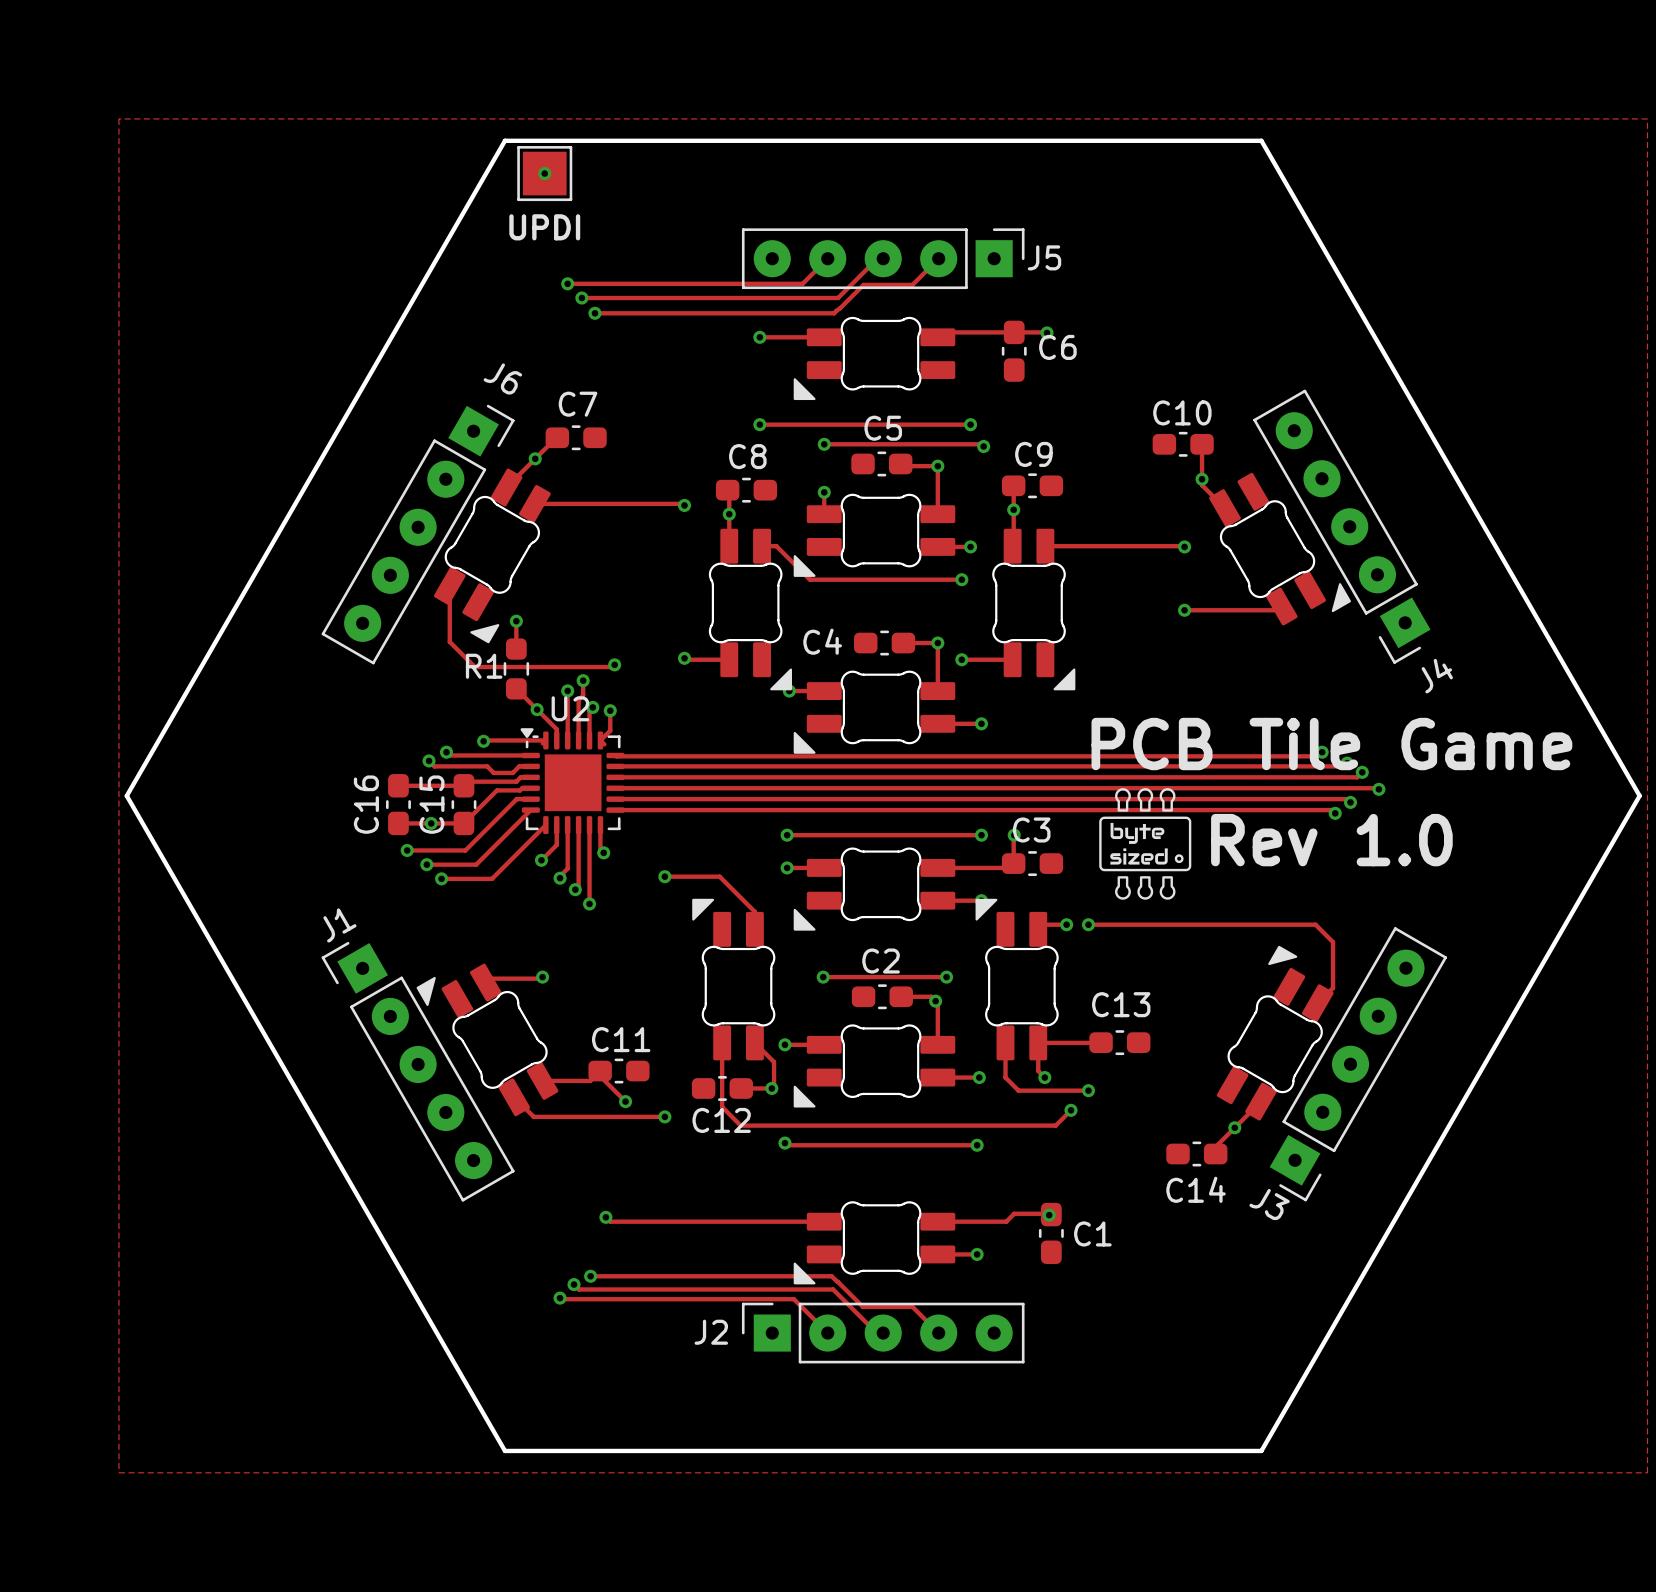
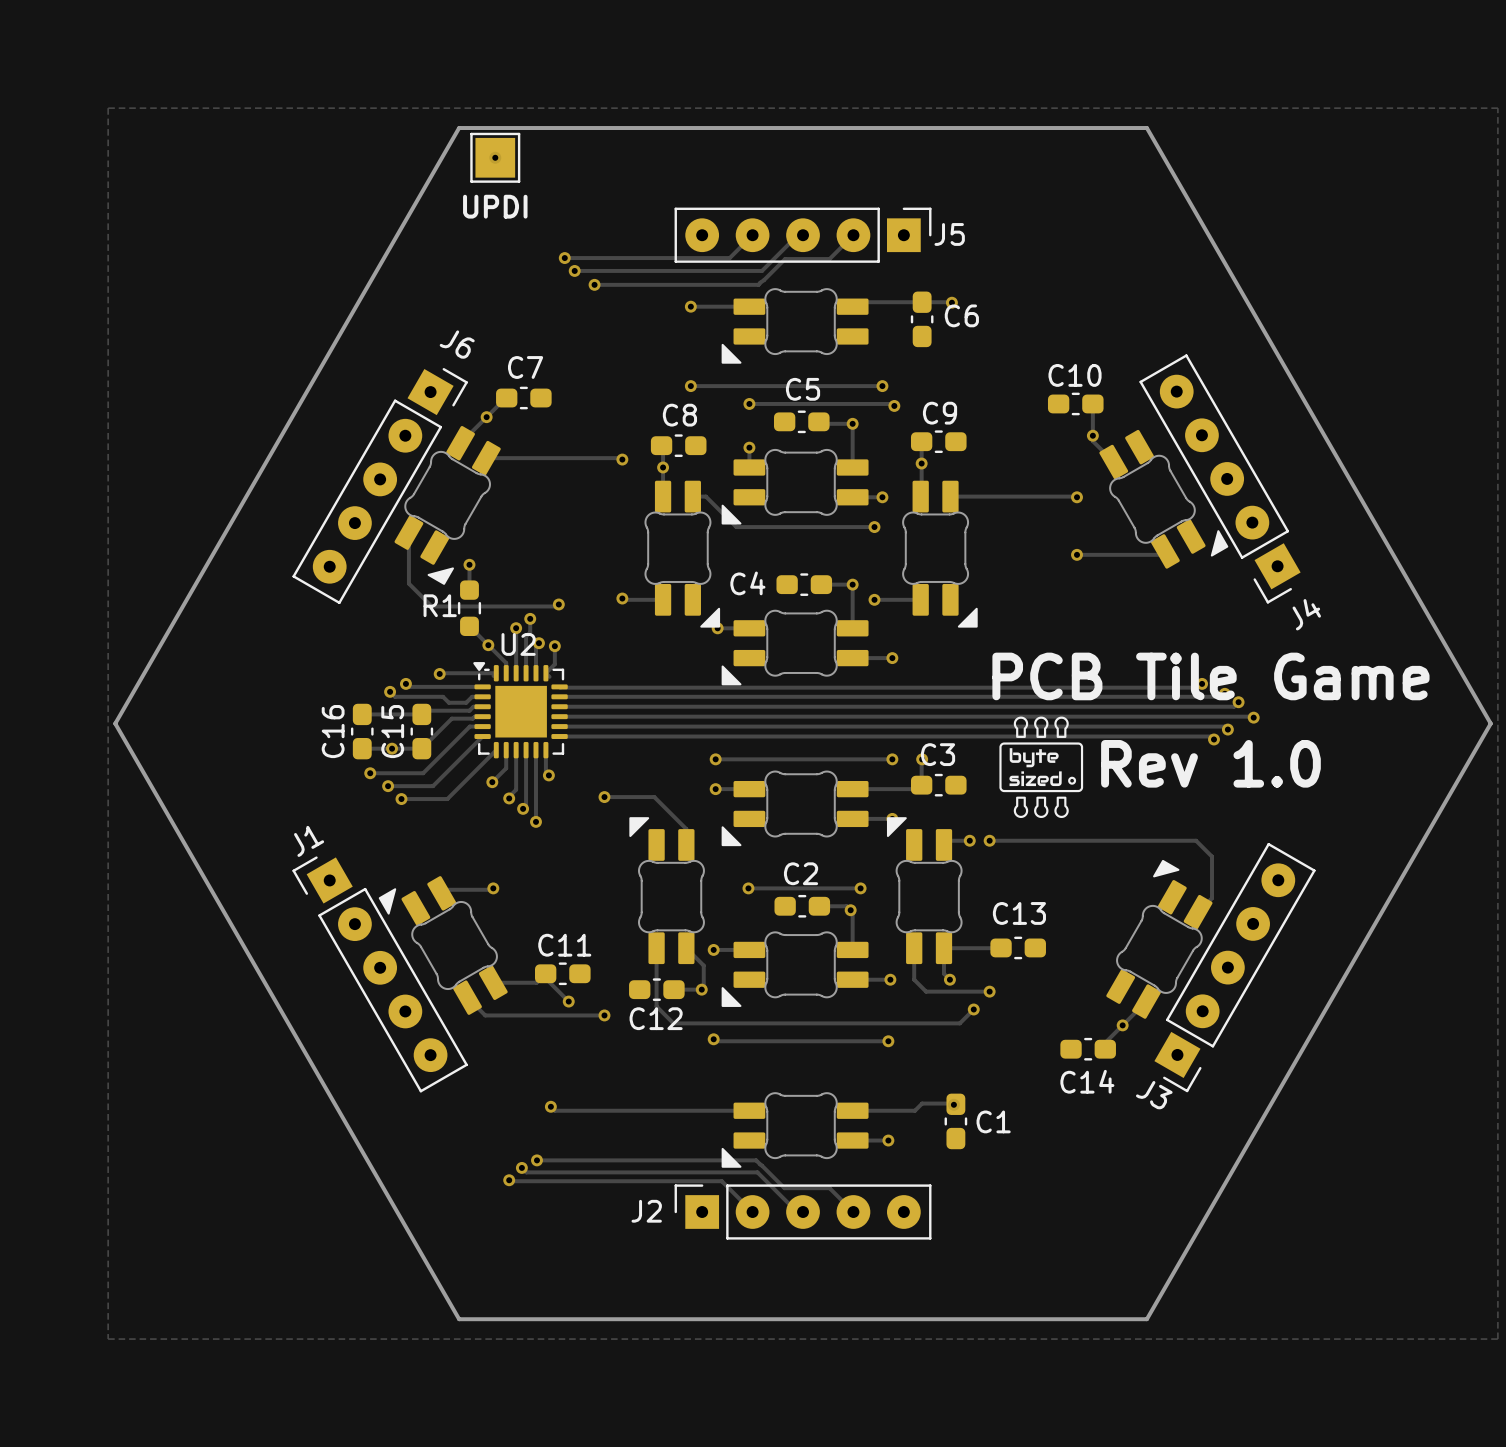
track: (567, 283) (621, 283) -> none
via: (567, 283) -> none
via: none -> (564, 258)
track: (581, 298) (632, 298) -> none
via: (581, 298) -> none
via: none -> (574, 270)
track: (594, 313) (653, 313) -> none
via: (594, 313) -> none
via: none -> (594, 284)

